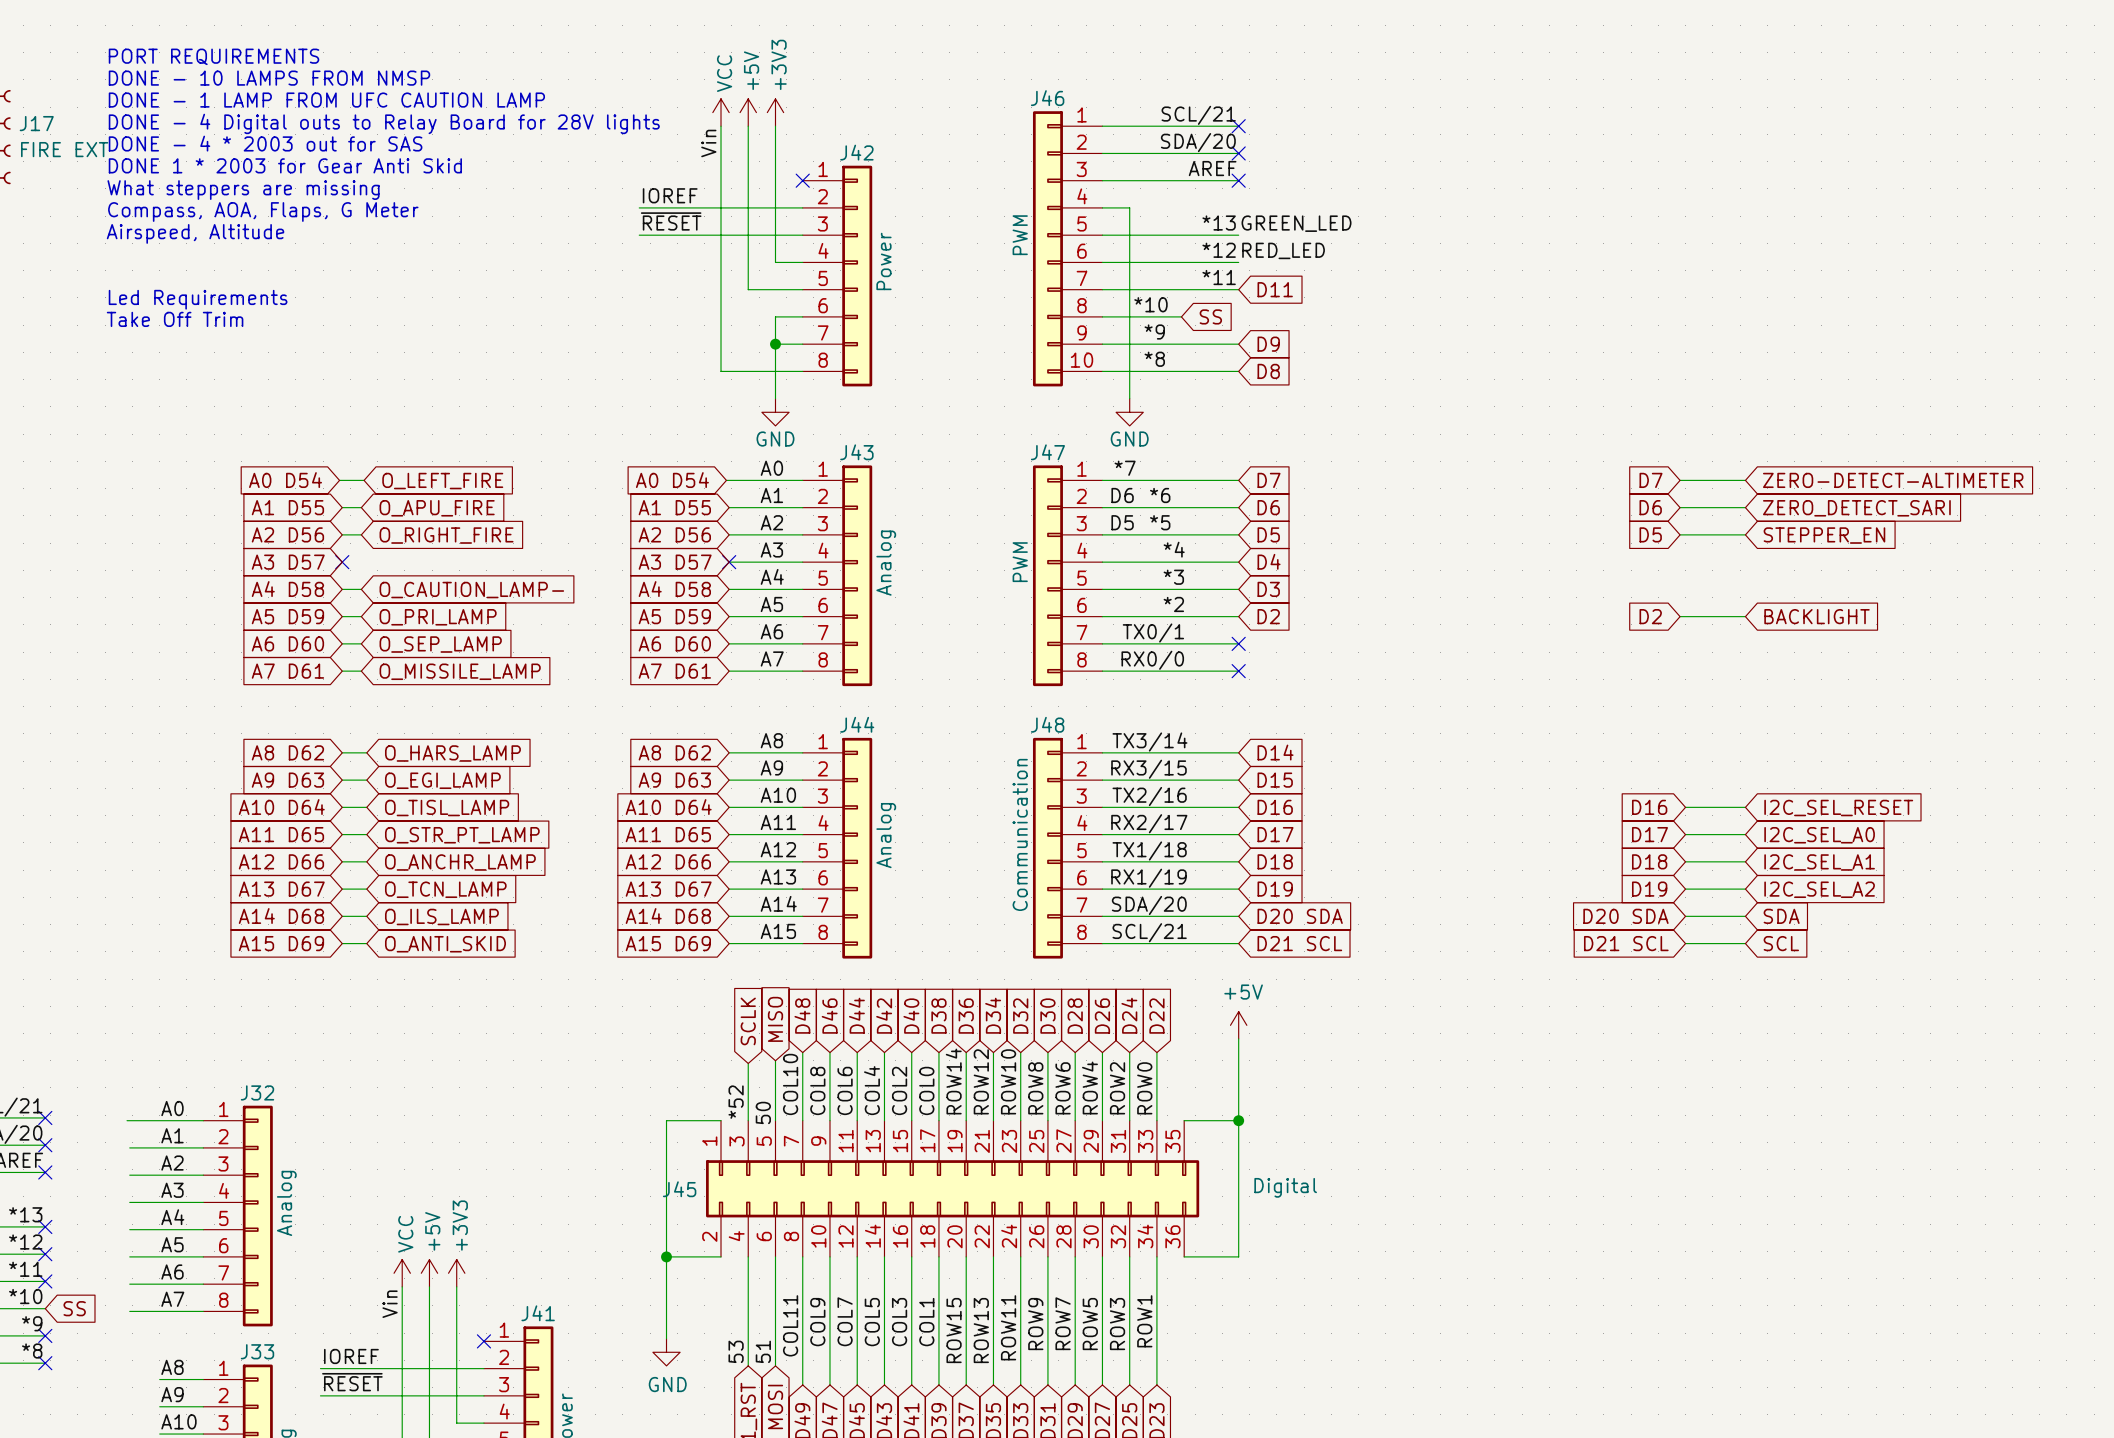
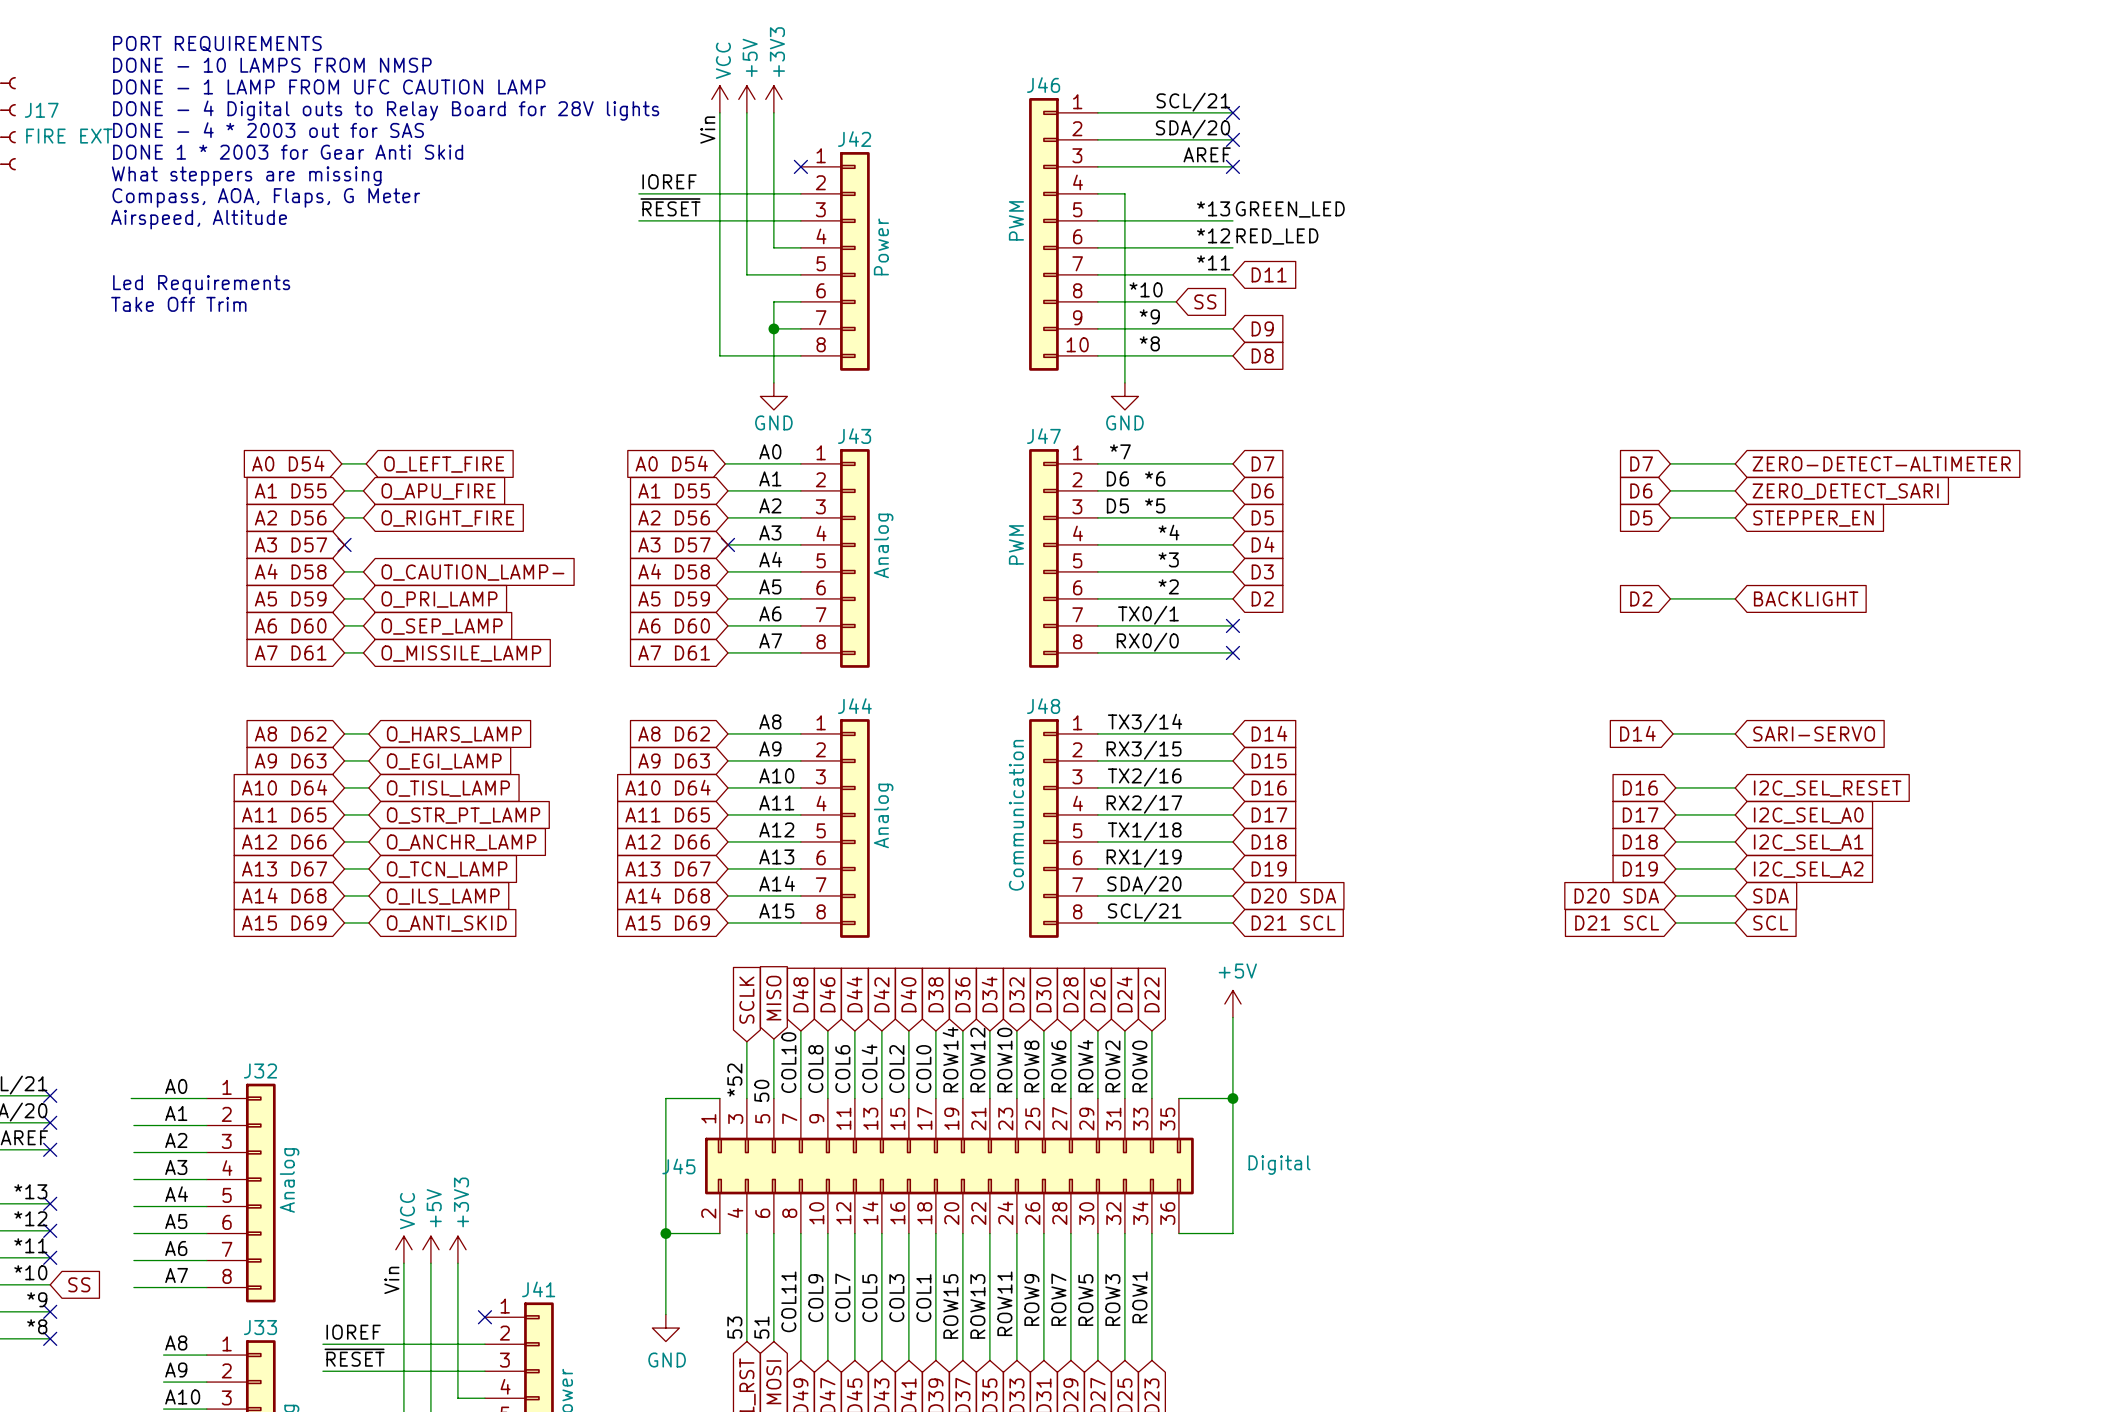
global label: none -> D14 (1637, 733)
wire: none -> (1673, 733) (1735, 733)
global label: none -> SARI-SERVO (1814, 733)

